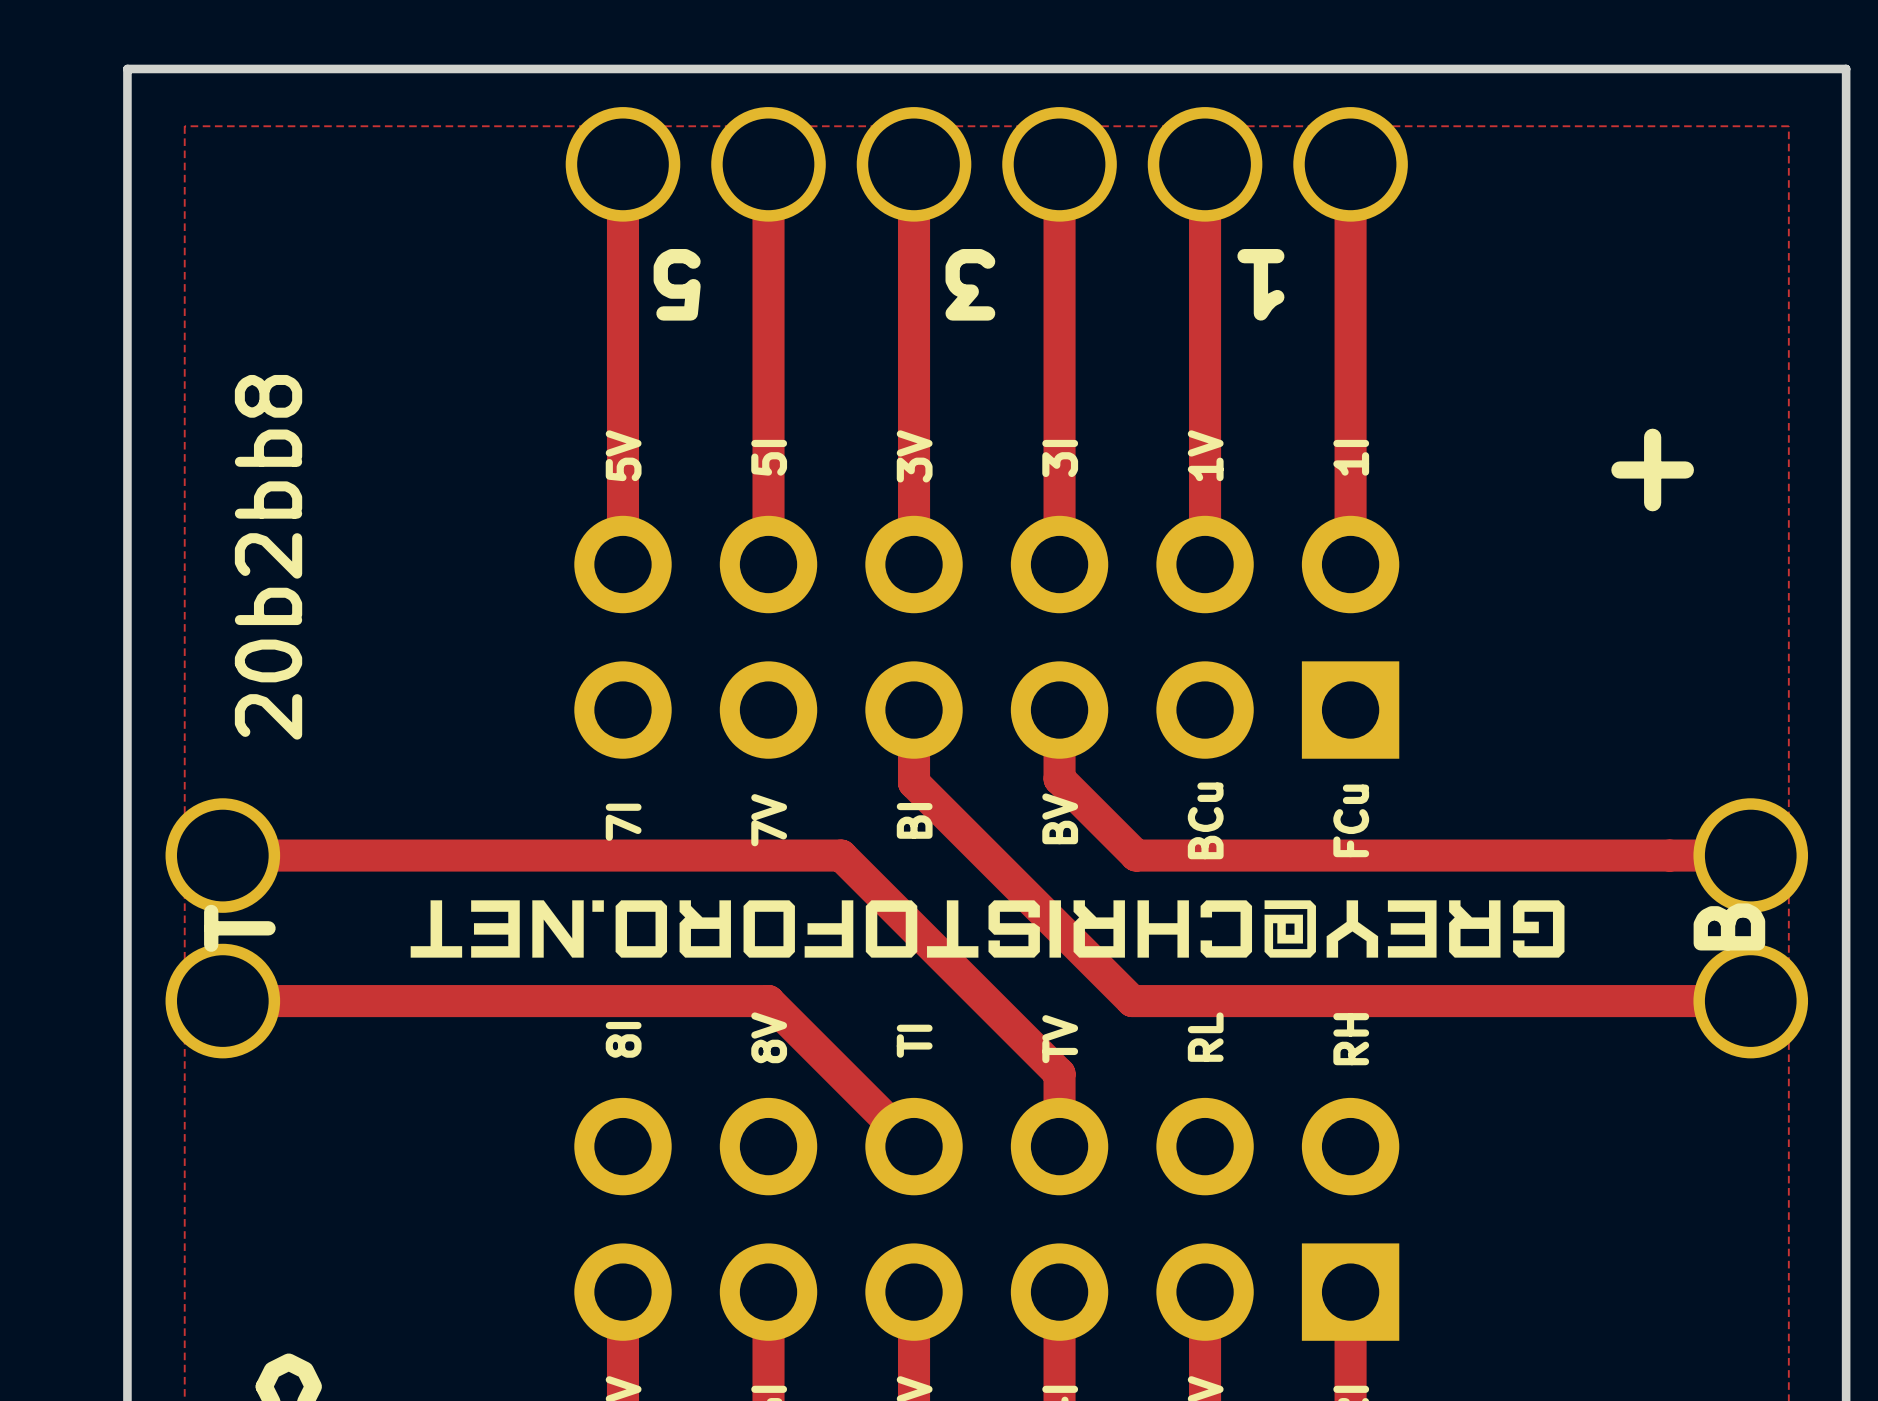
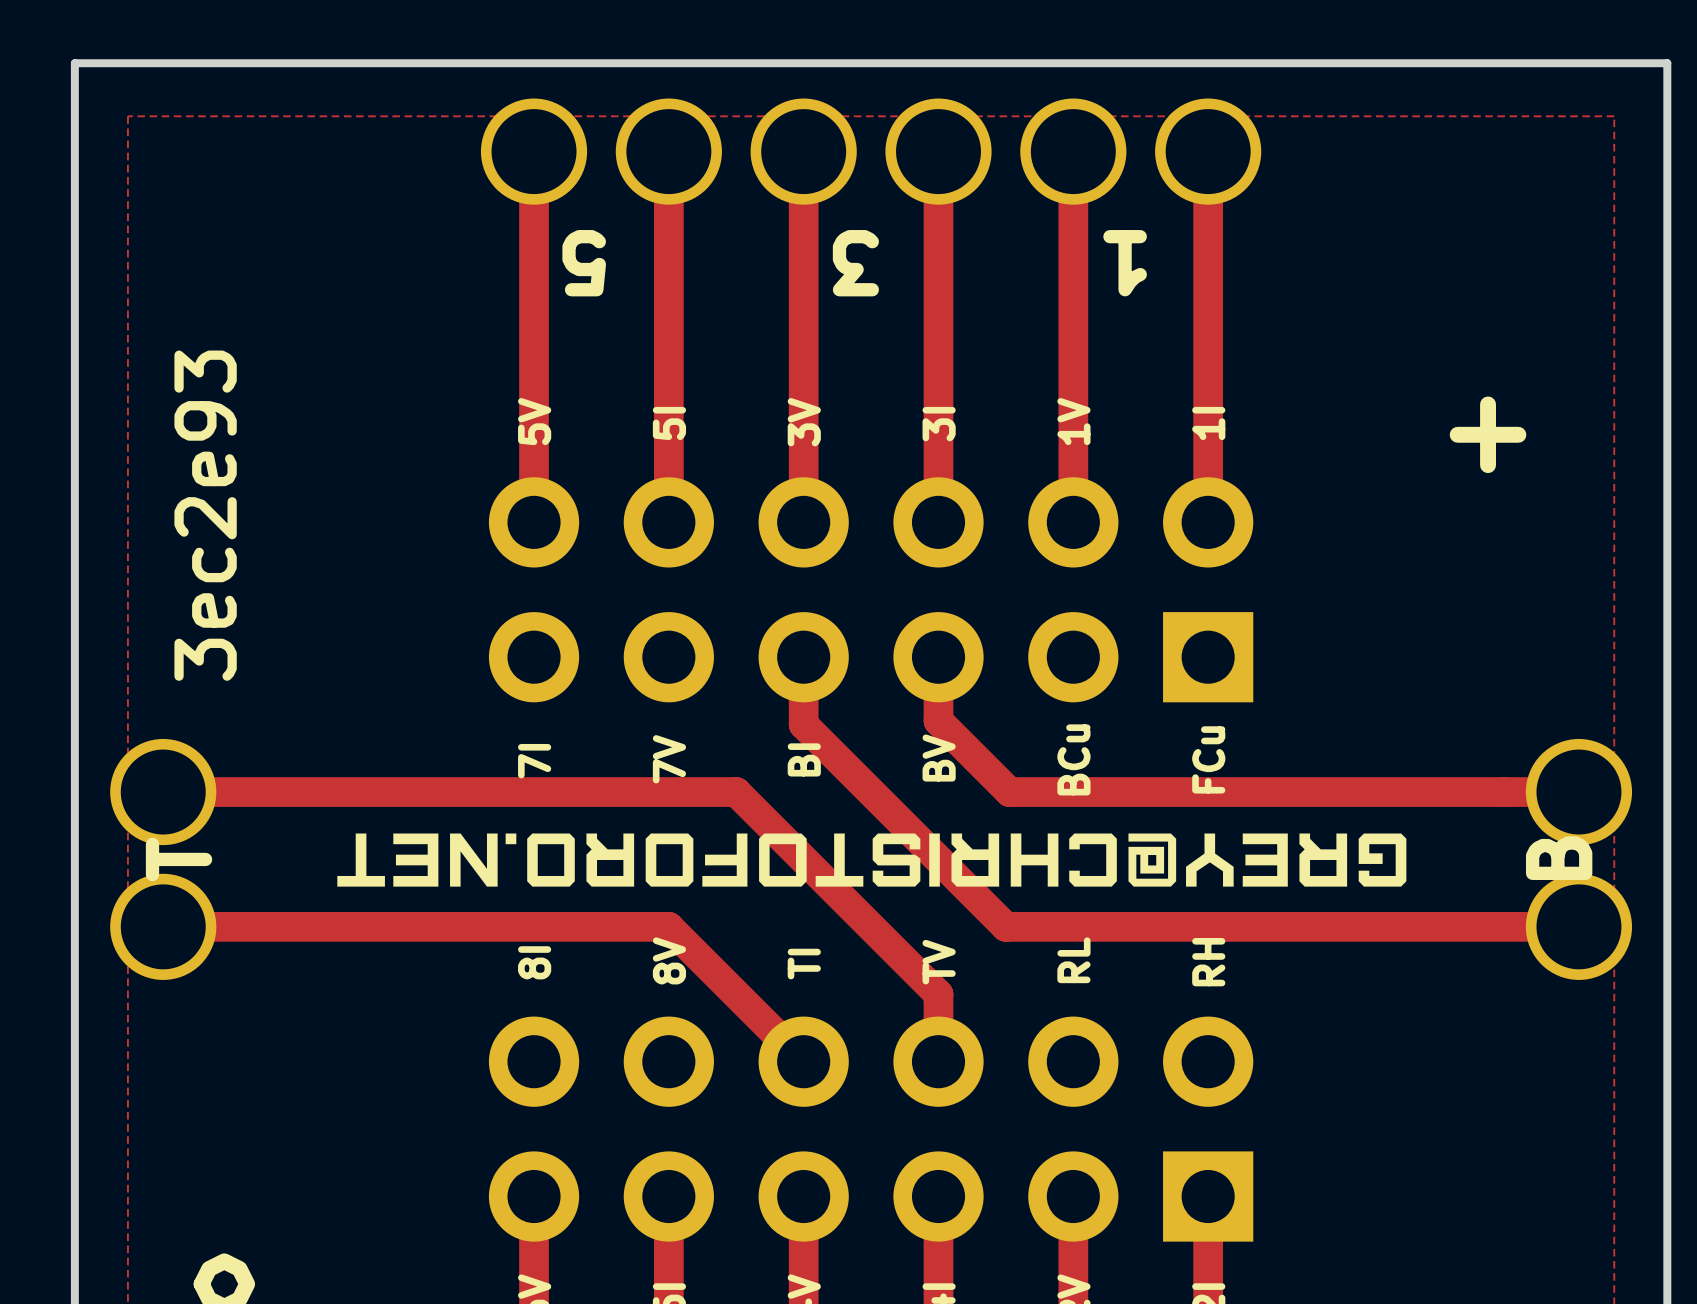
text: 20b2bb8 (268, 557) -> 3ec2e93 (205, 515)

